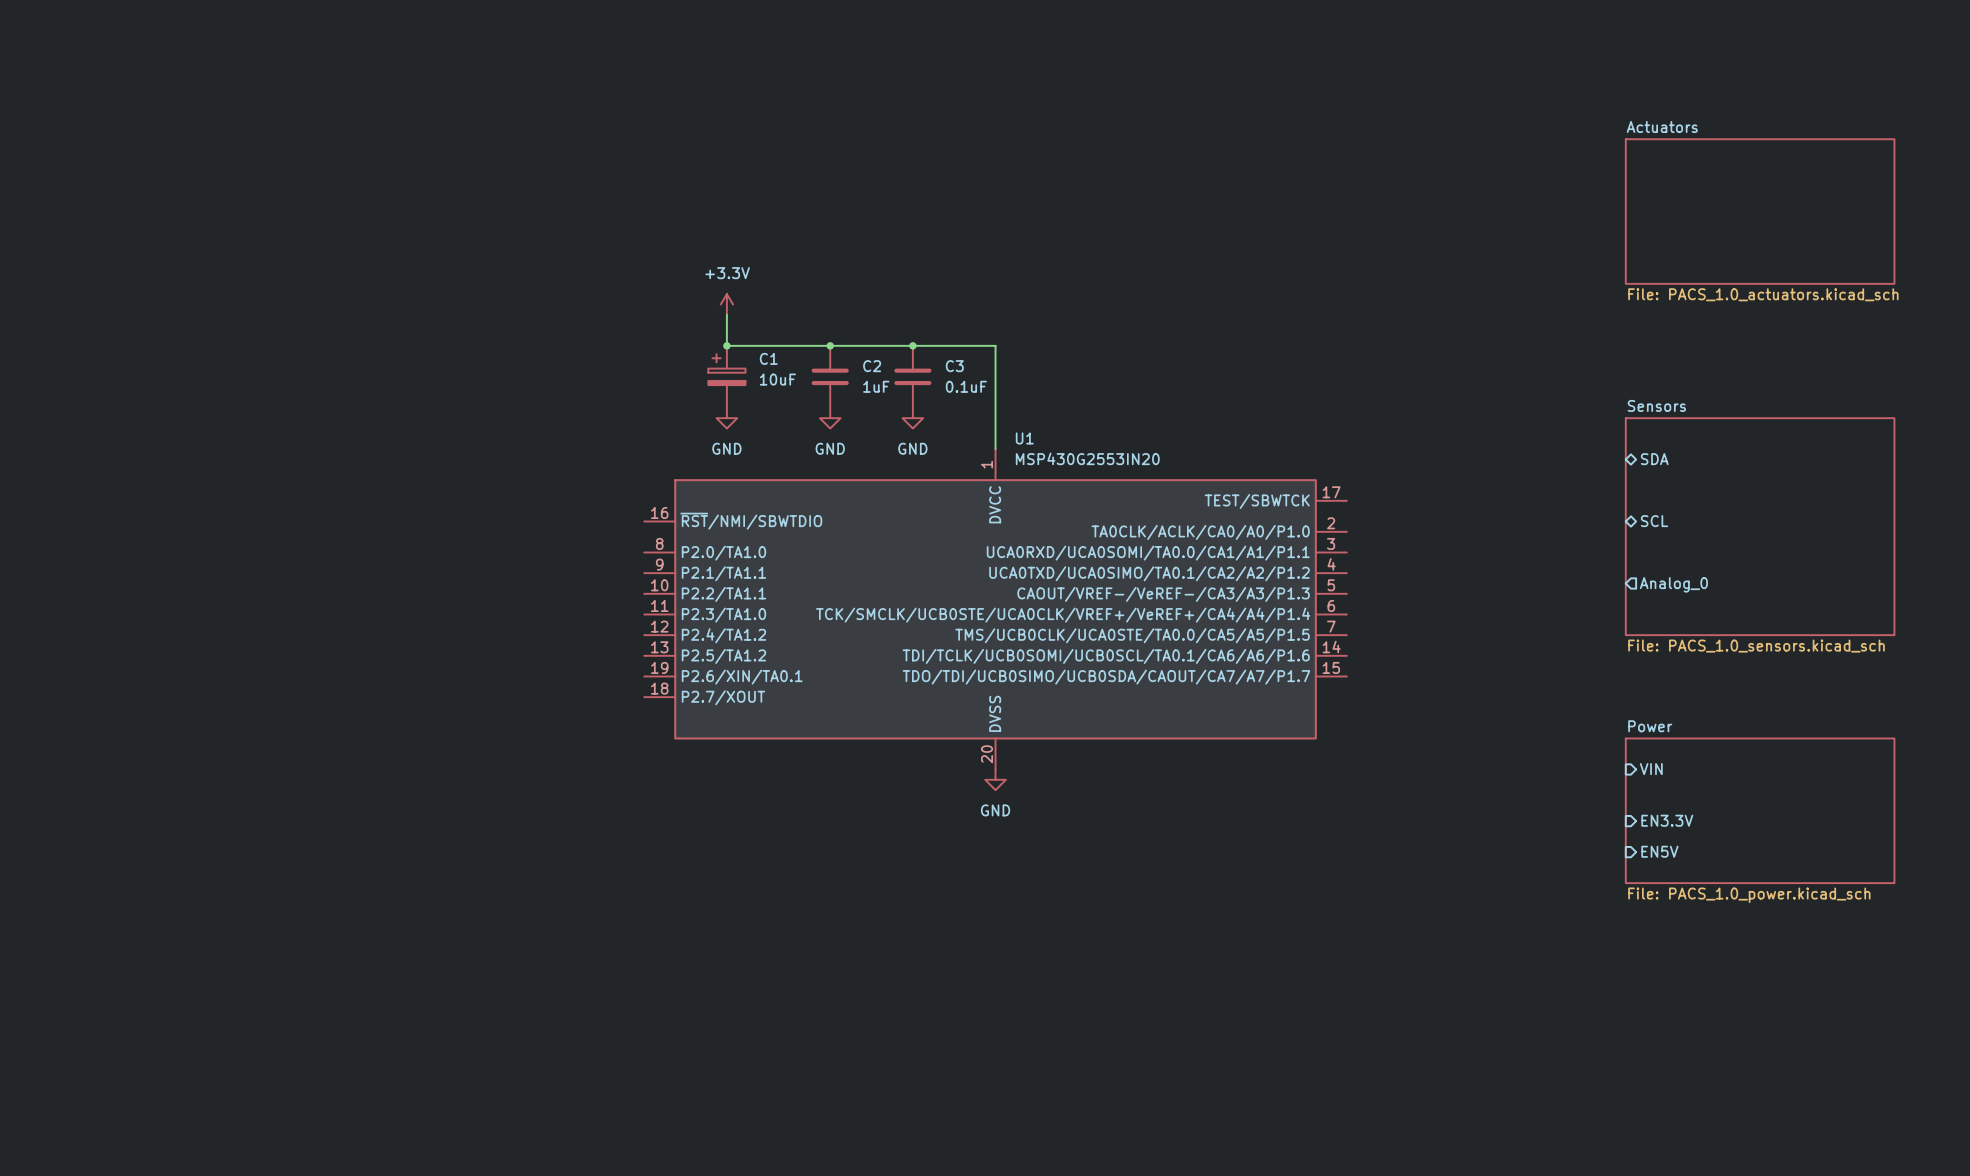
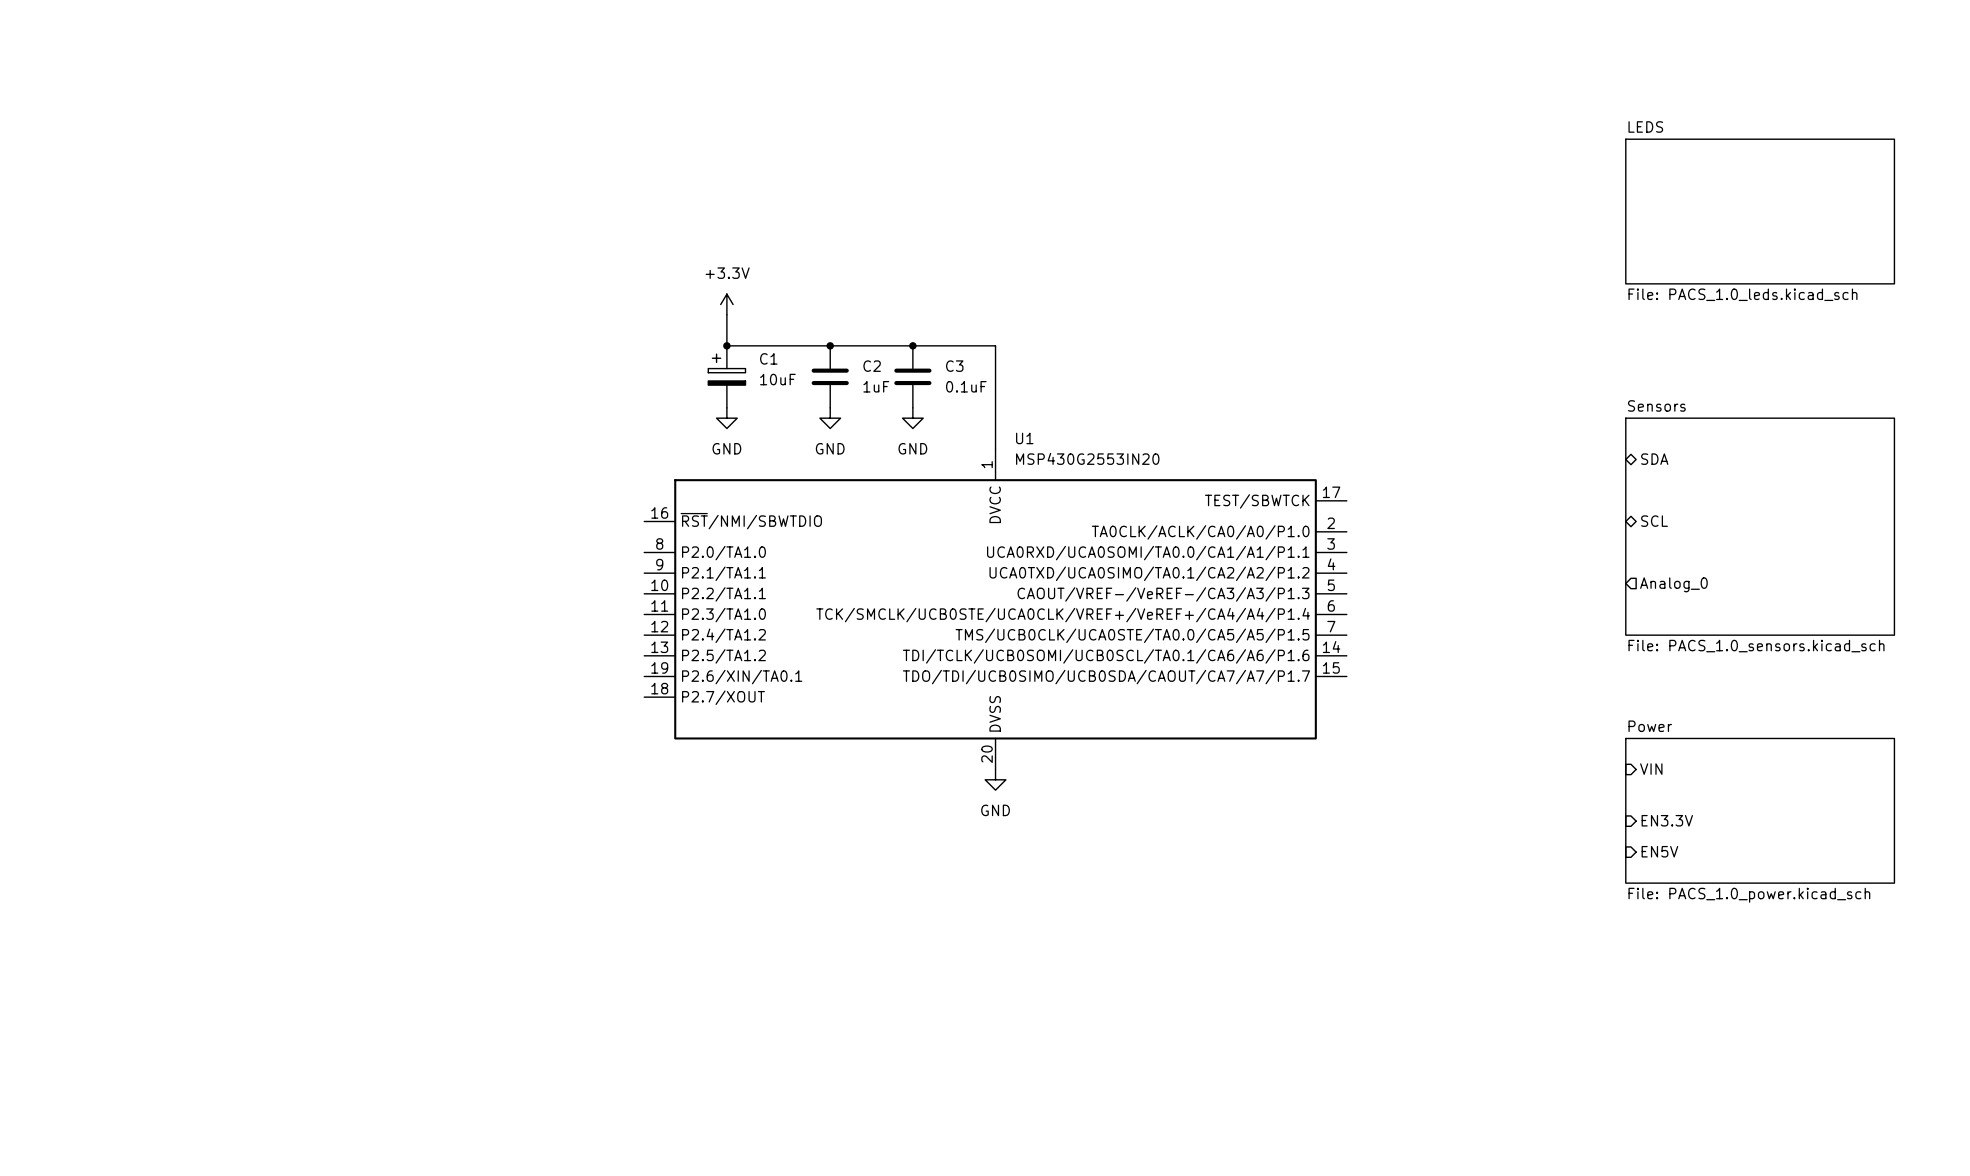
sheet Actuators name: Actuators (1662, 126) -> LEDS (1645, 126)
sheet Actuators value: File: PACS_1.0_actuators.kicad_sch (1763, 294) -> File: PACS_1.0_leds.kicad_sch (1742, 294)

